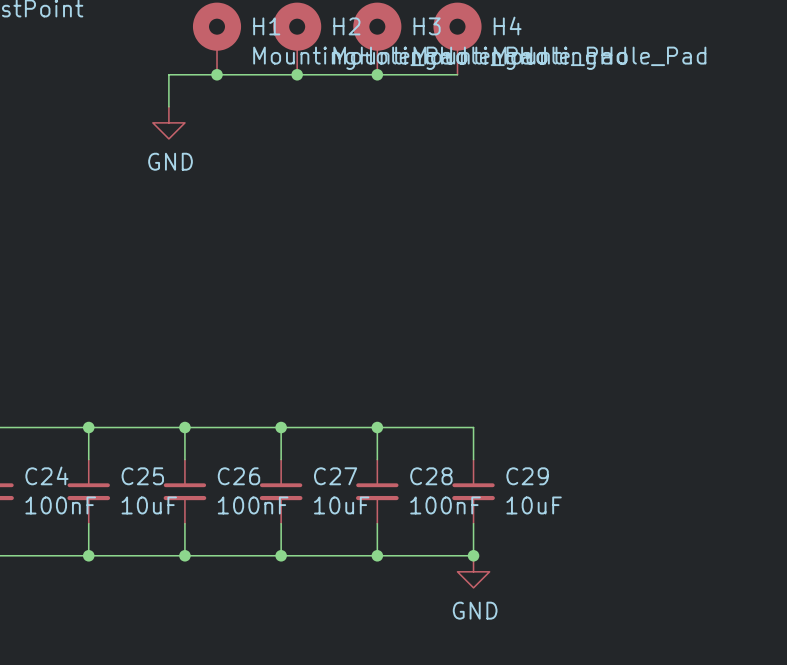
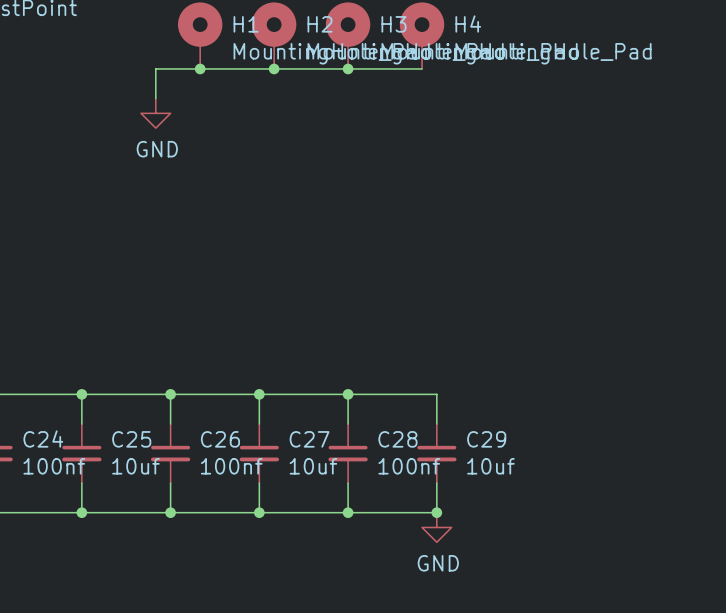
C24 value: 100nF (60, 505) -> 100nf (54, 466)
C25 value: 10uF (149, 505) -> 10uf (135, 466)
C26 value: 100nF (253, 505) -> 100nf (231, 466)
C27 value: 10uF (341, 505) -> 10uf (313, 466)
C28 value: 100nF (445, 505) -> 100nf (409, 466)
C29 value: 10uF (534, 505) -> 10uf (490, 466)

